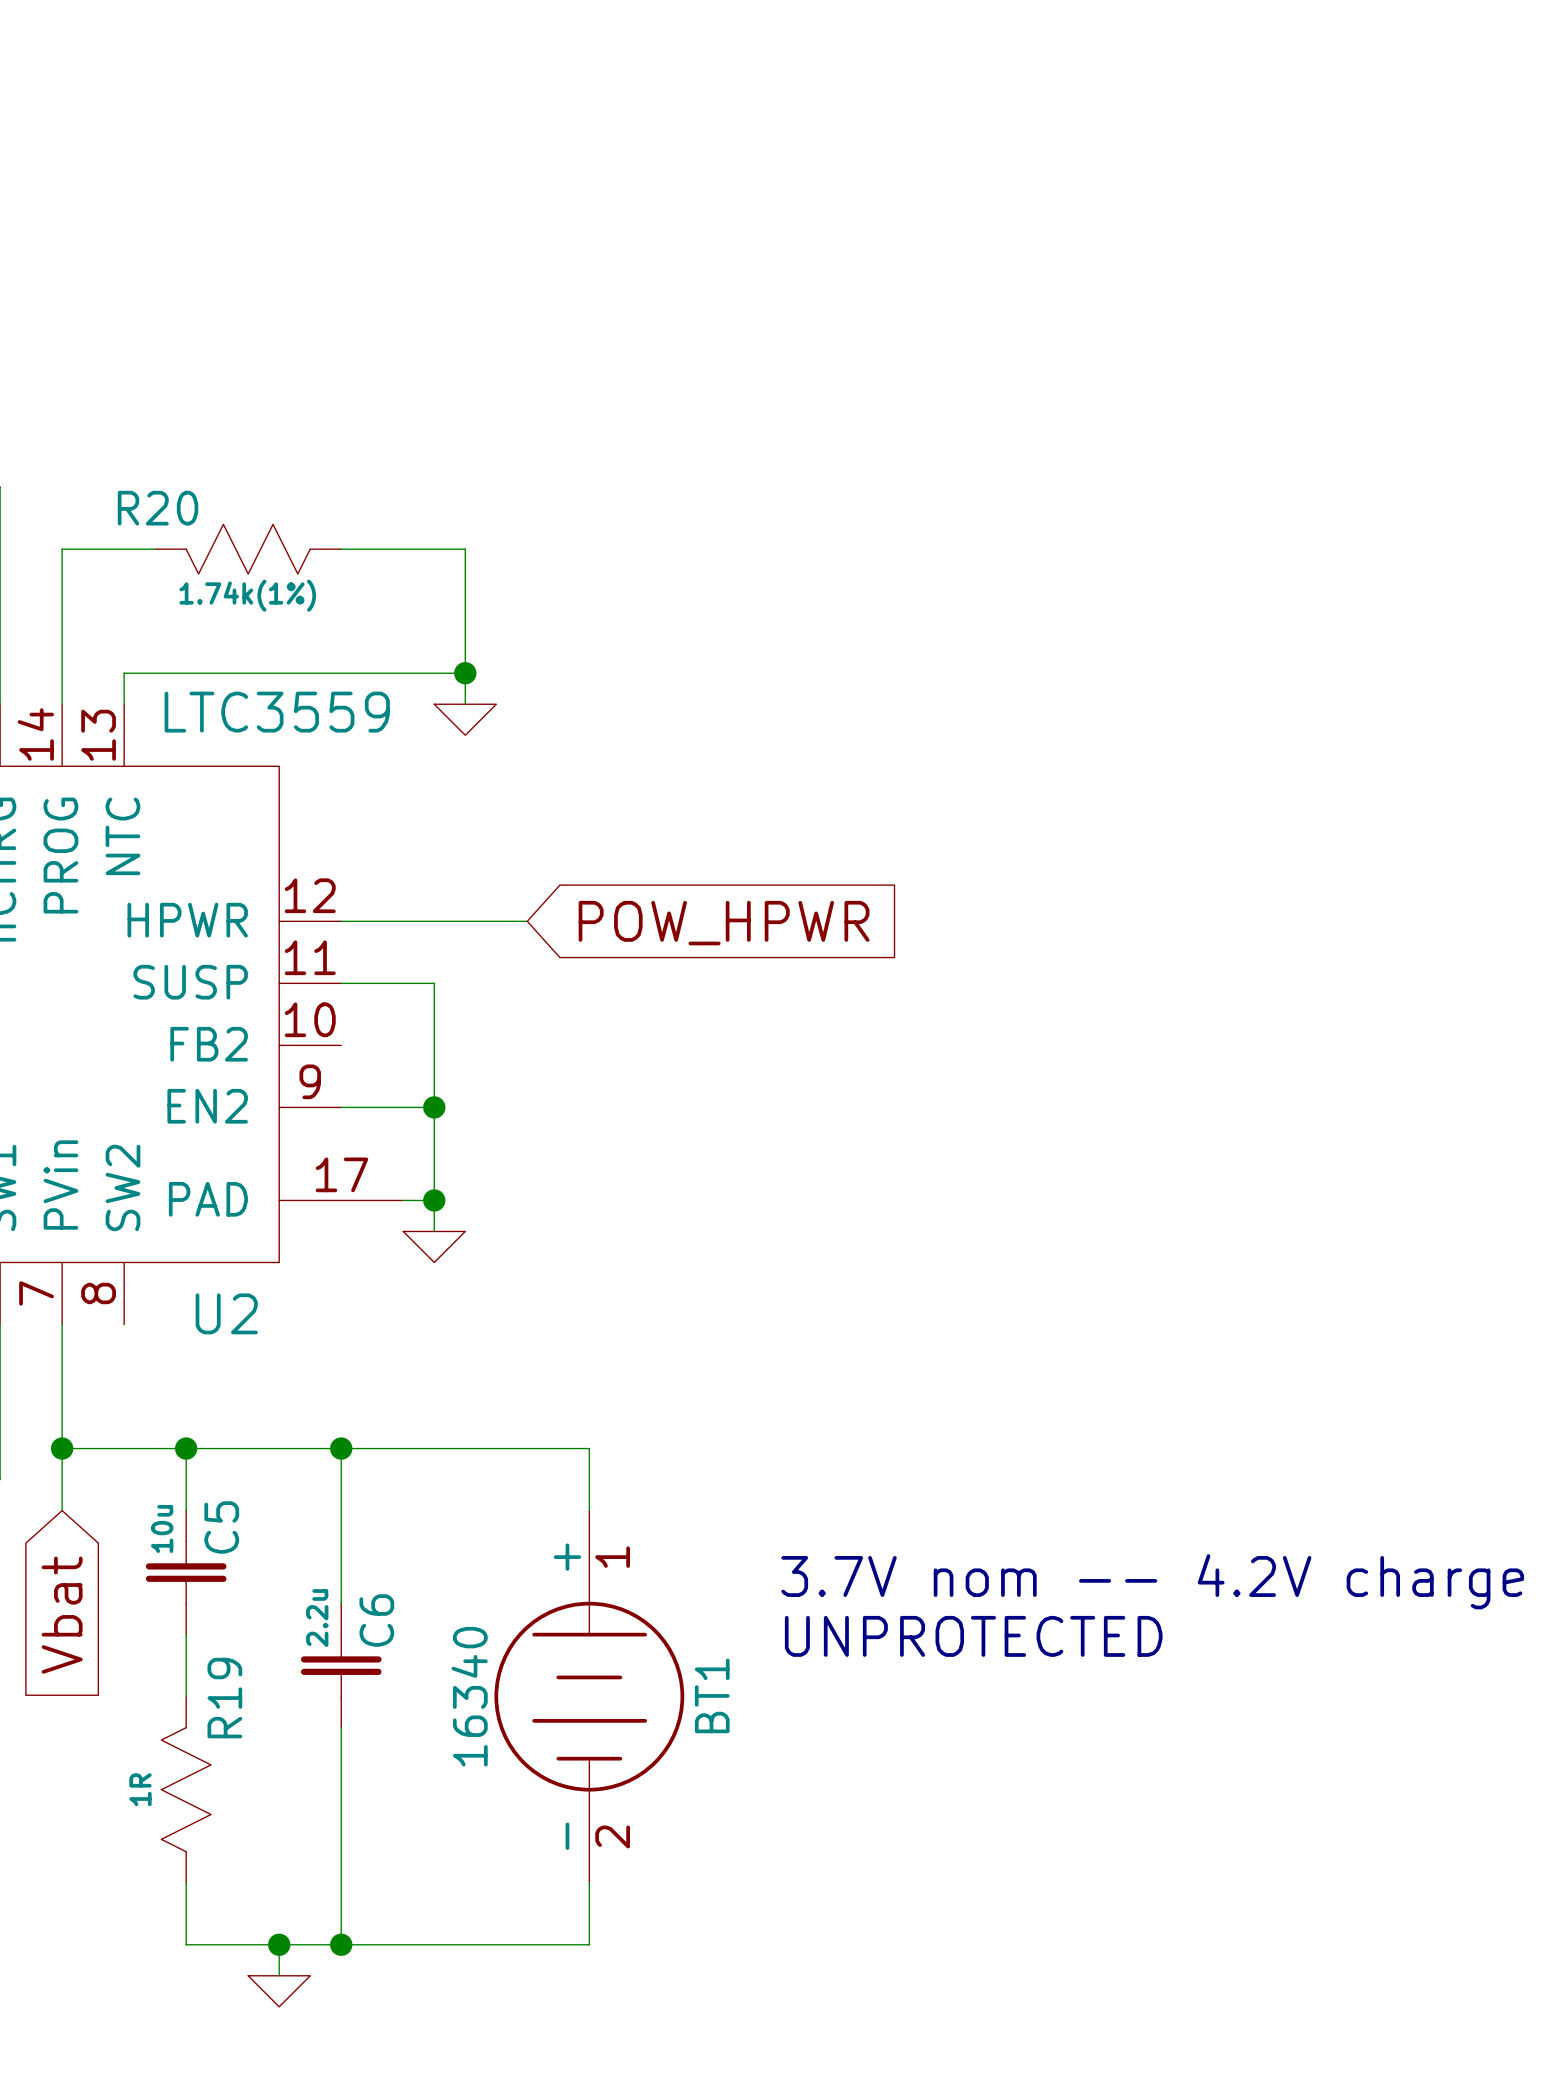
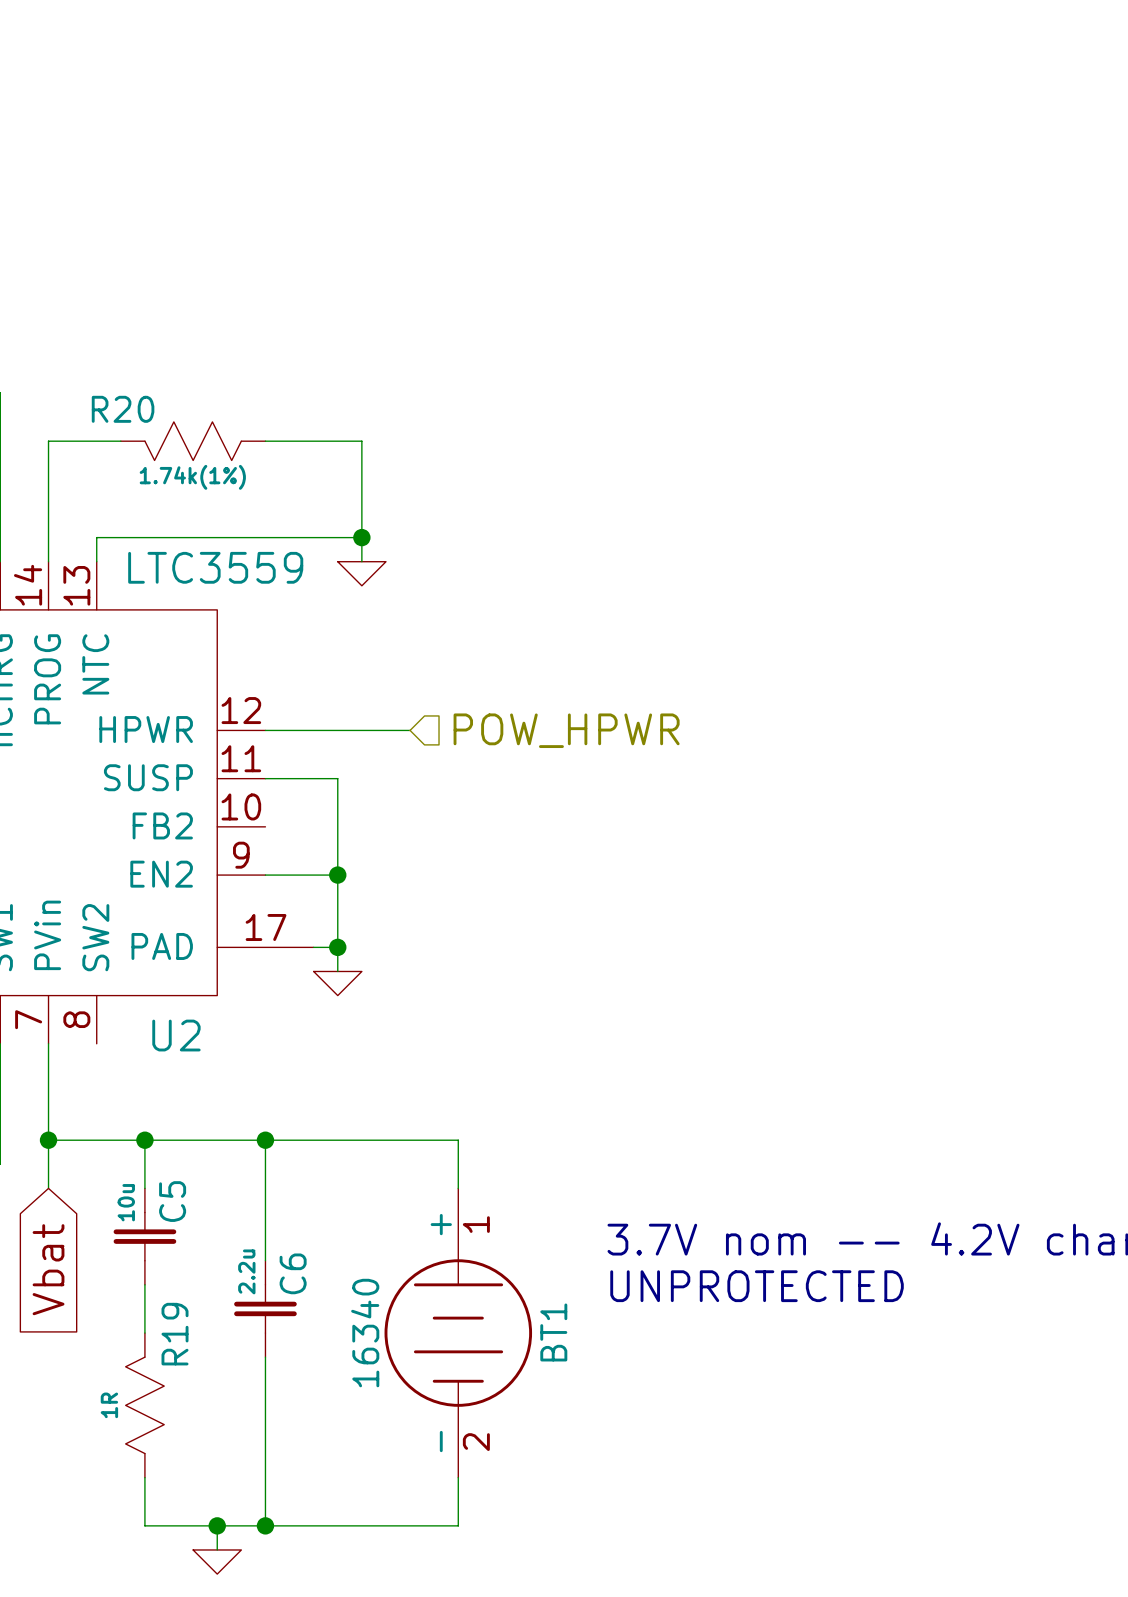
hierarchical label: none -> POW_HPWR (566, 730)
global label: POW_HPWR (724, 923) -> none

